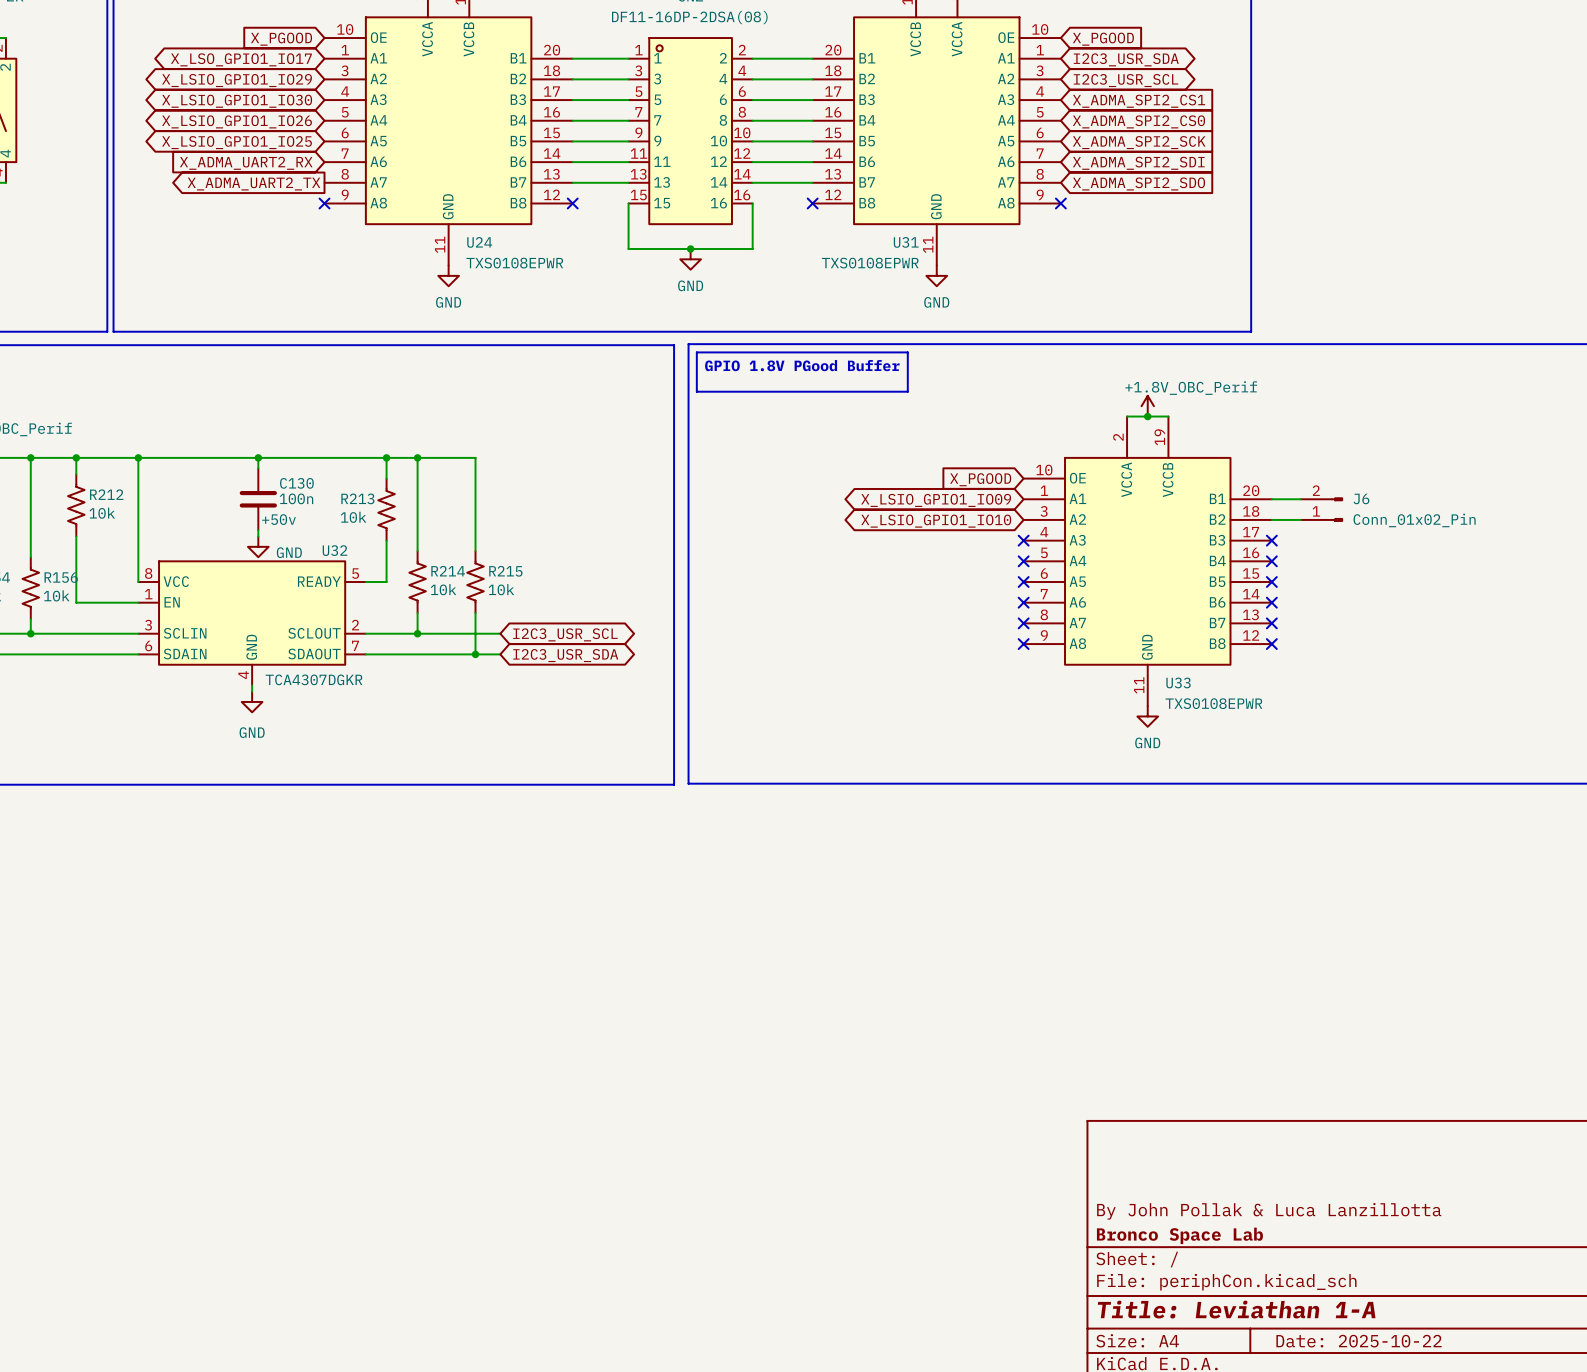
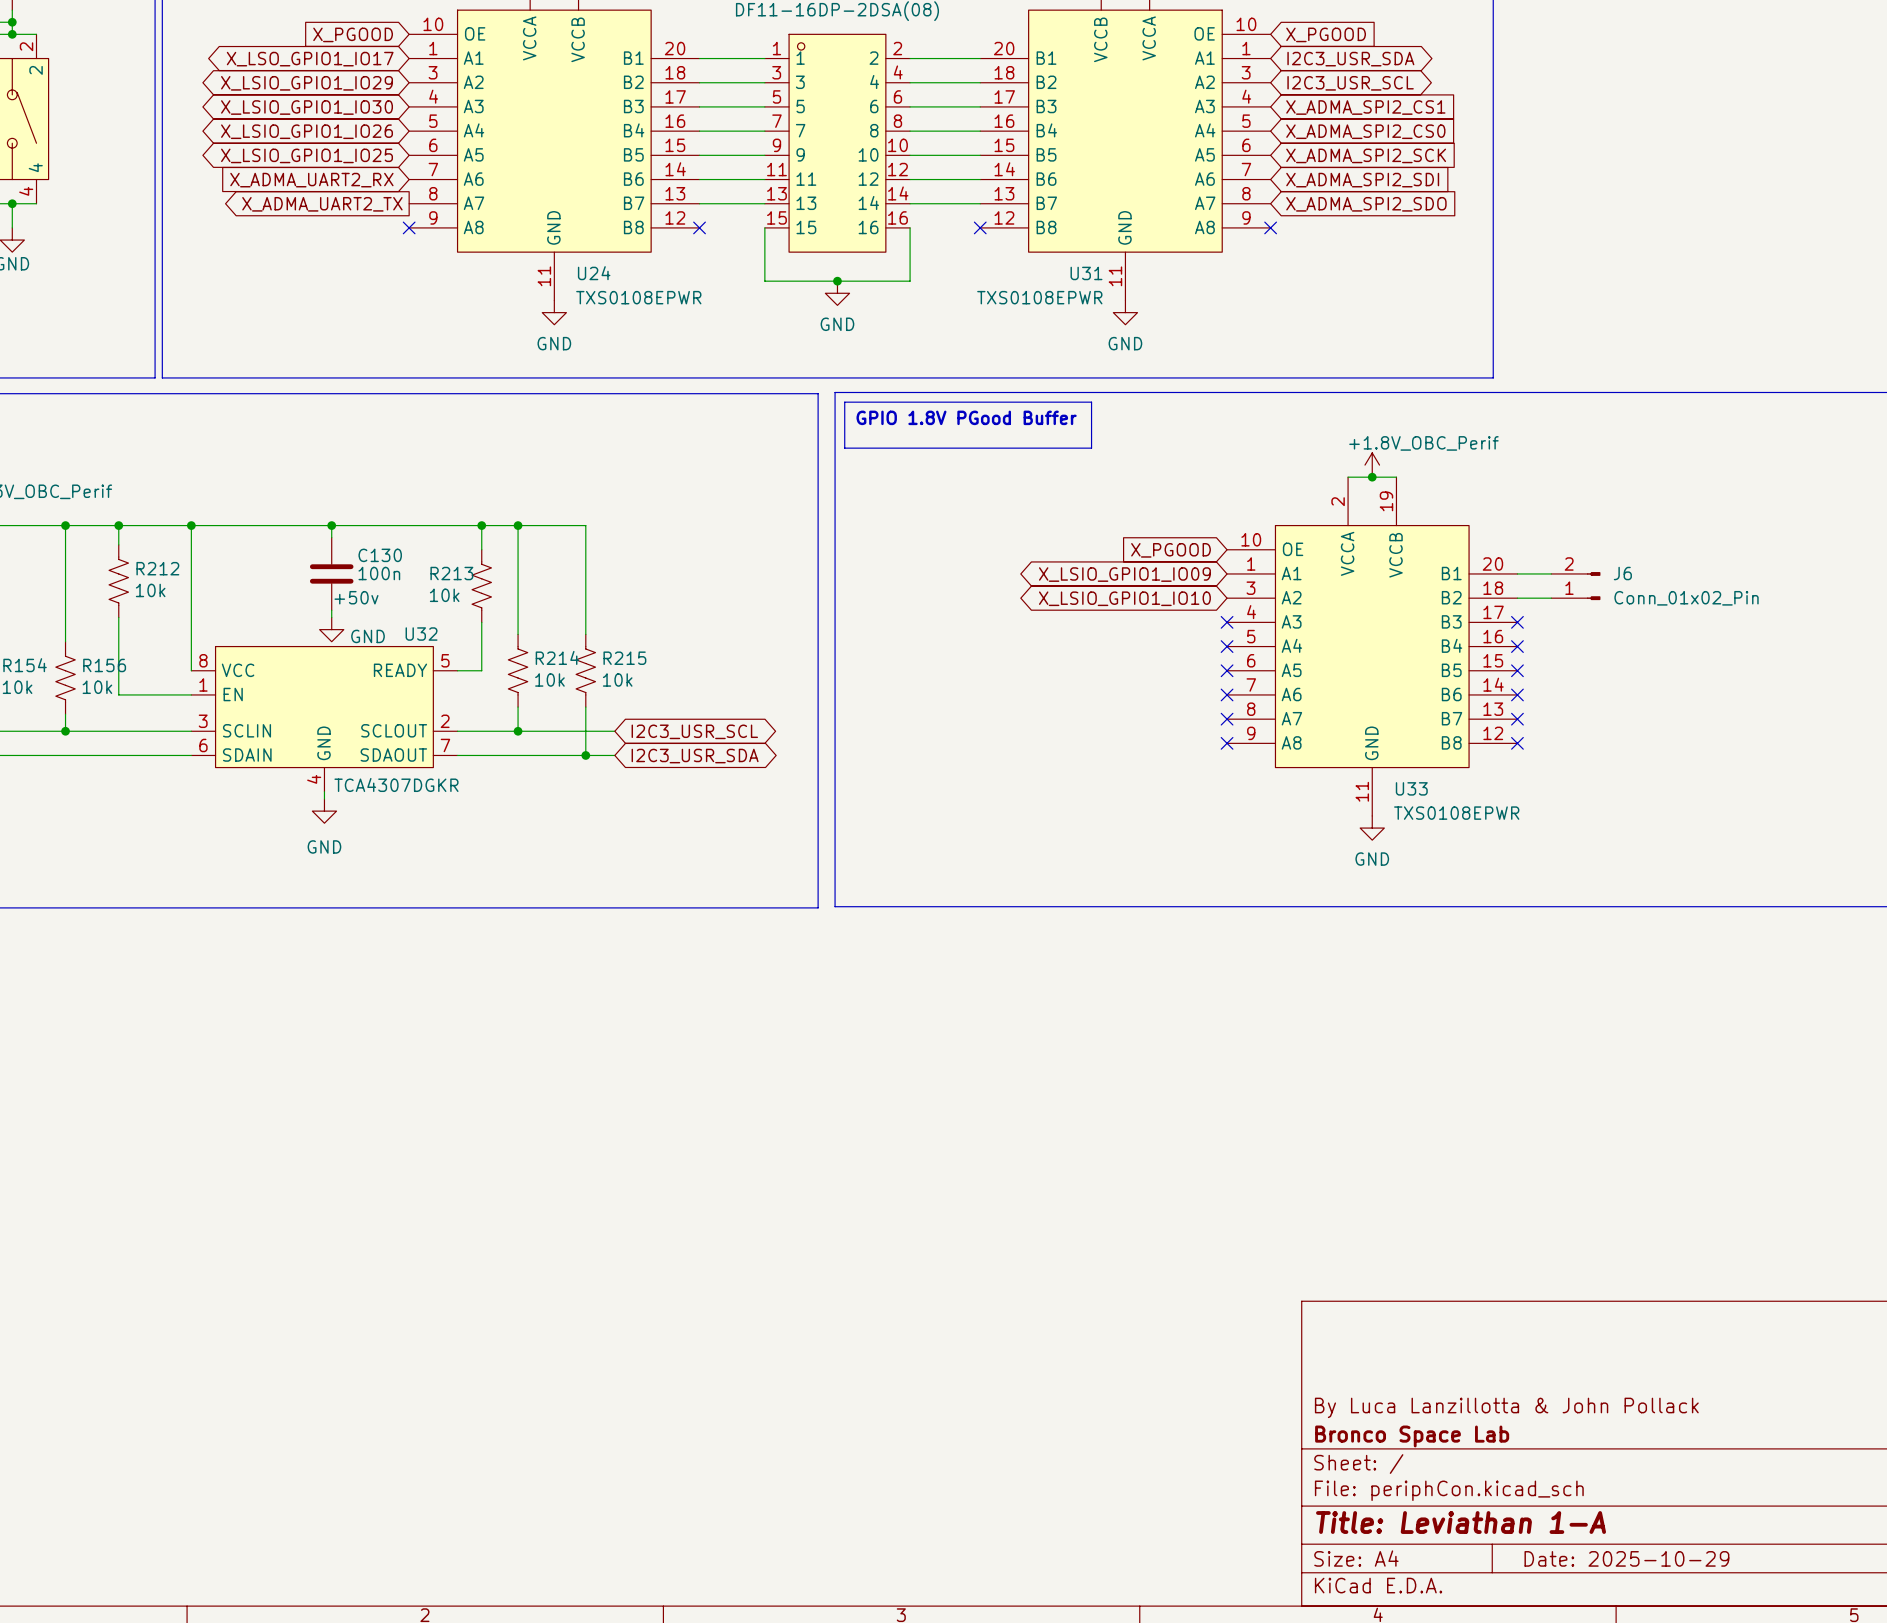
title block: By John Pollak & Luca Lanzillotta (1269, 1211) -> By Luca Lanzillotta & John Pollack (1506, 1407)
title block: Date: 2025-10-22 (1359, 1341) -> Date: 2025-10-29 (1626, 1558)

